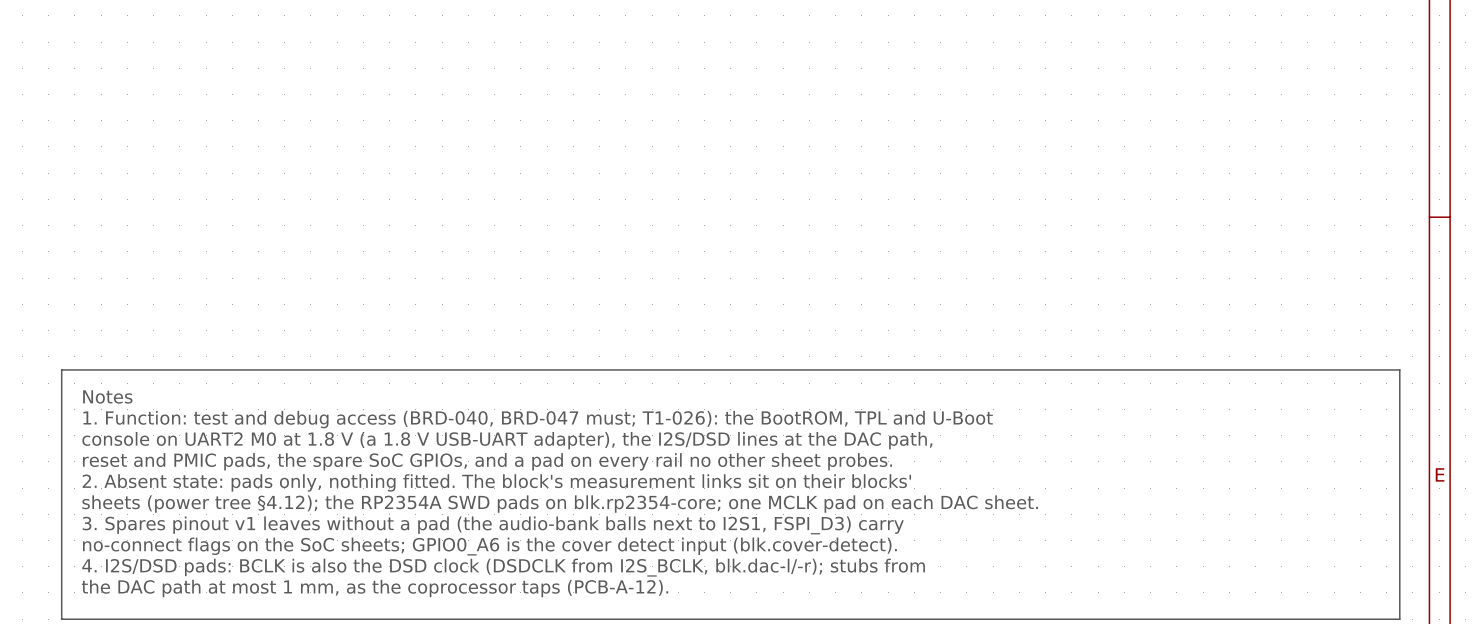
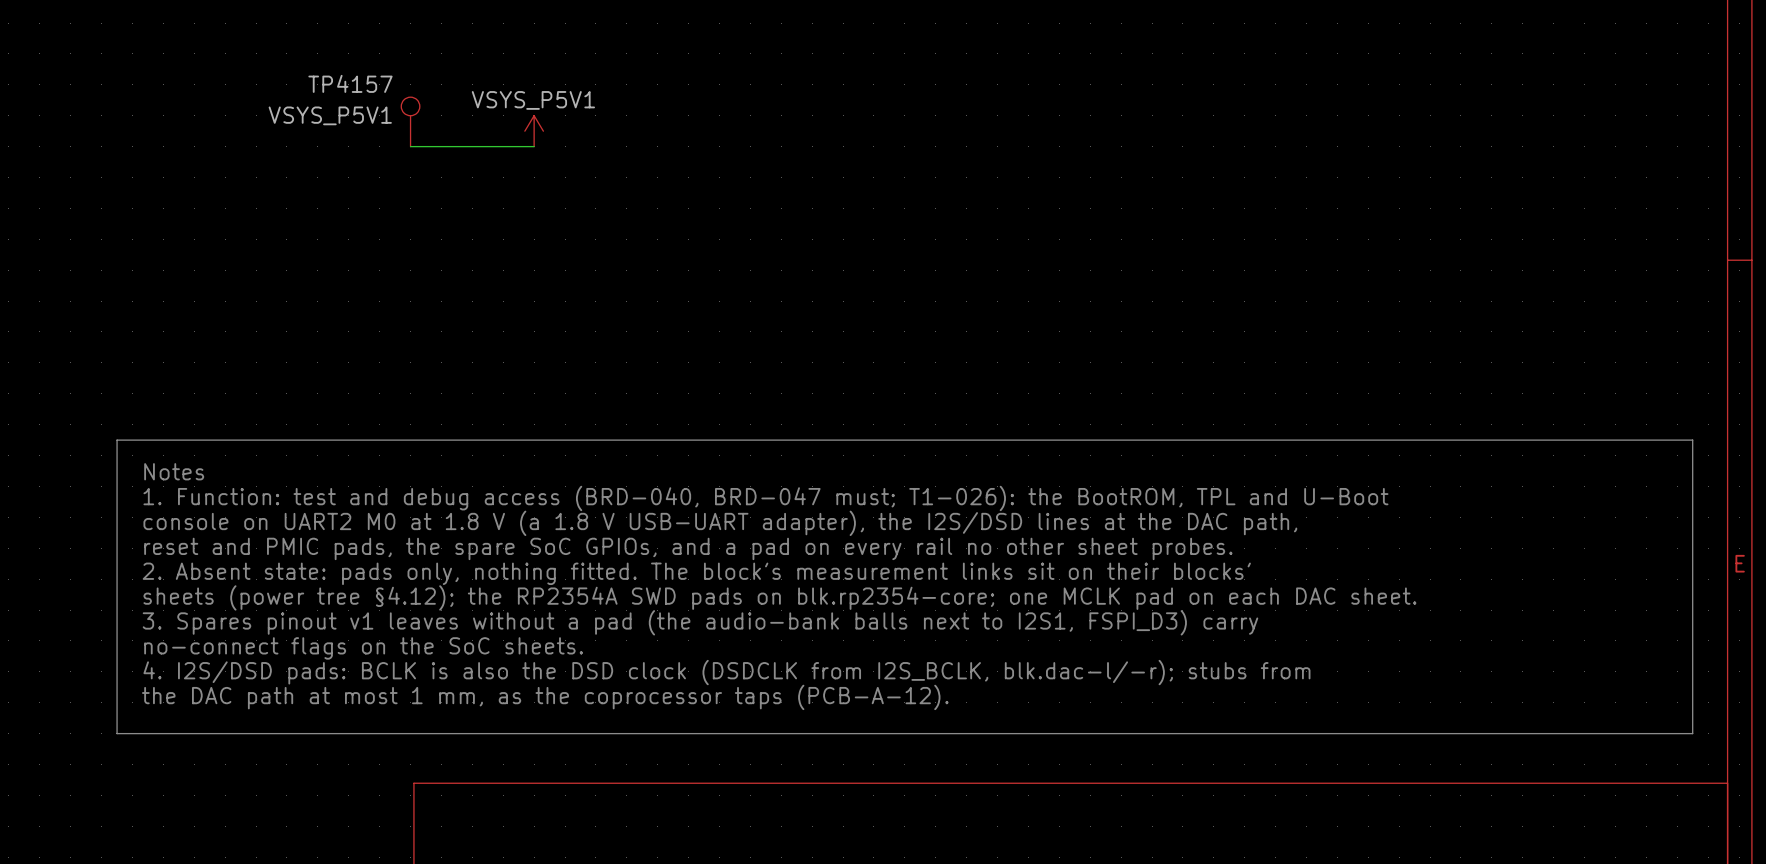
TP4157: none -> VSYS_P5V1 (410, 121)
power symbol: none -> VSYS_P5V1 (534, 131)
wire: none -> (410, 146) (534, 146)
text: no-connect flags on the SoC sheets; GPIO0_A6 is the cover detect input (blk.cover-detect). (489, 546) -> no-connect flags on the SoC sheets. (363, 648)

